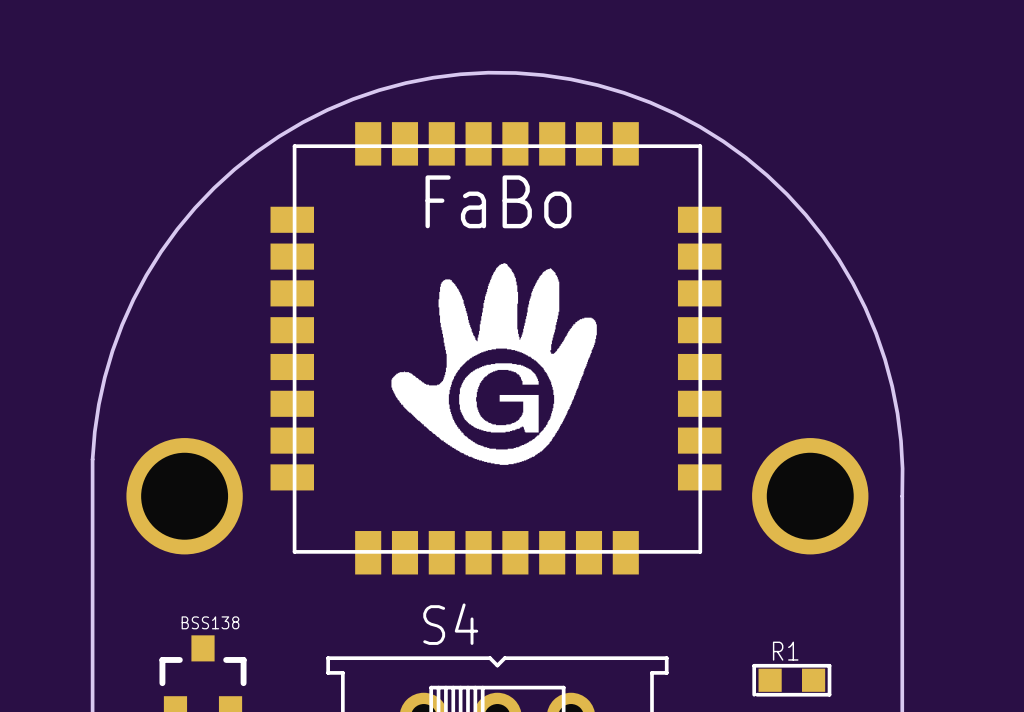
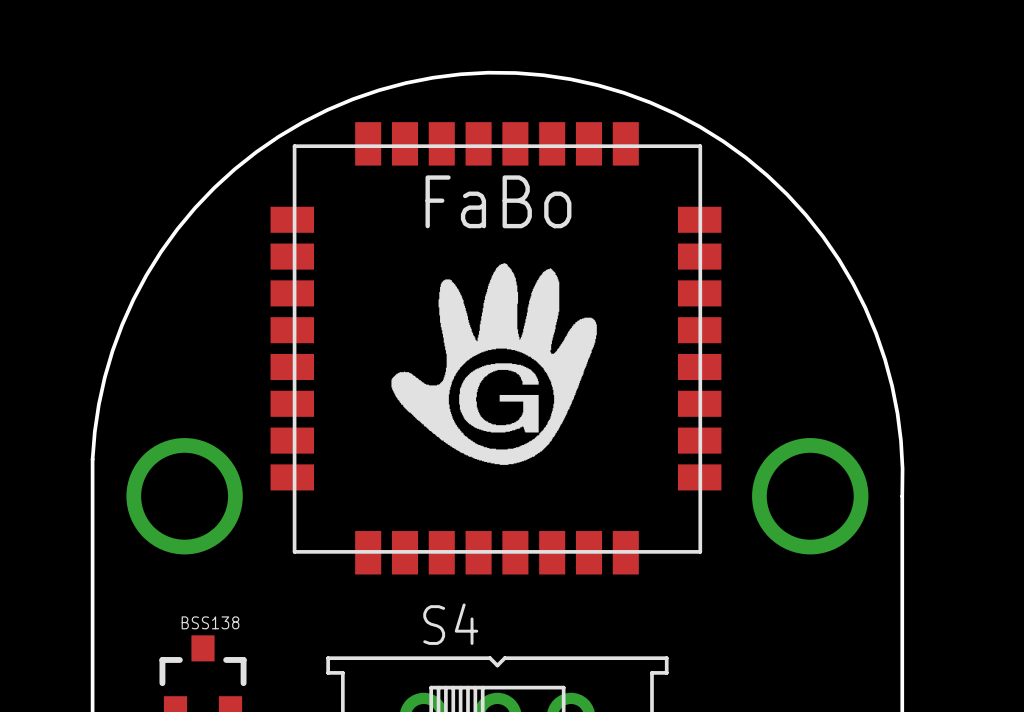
R1: (791, 680) -> none

